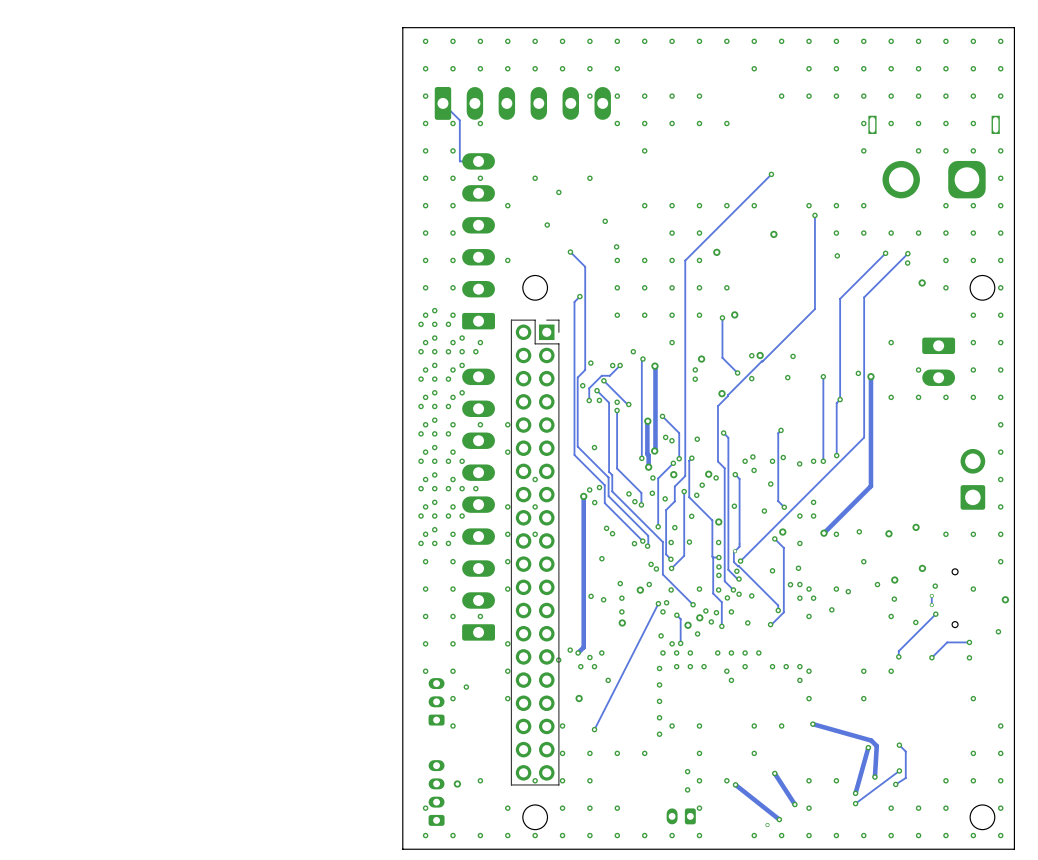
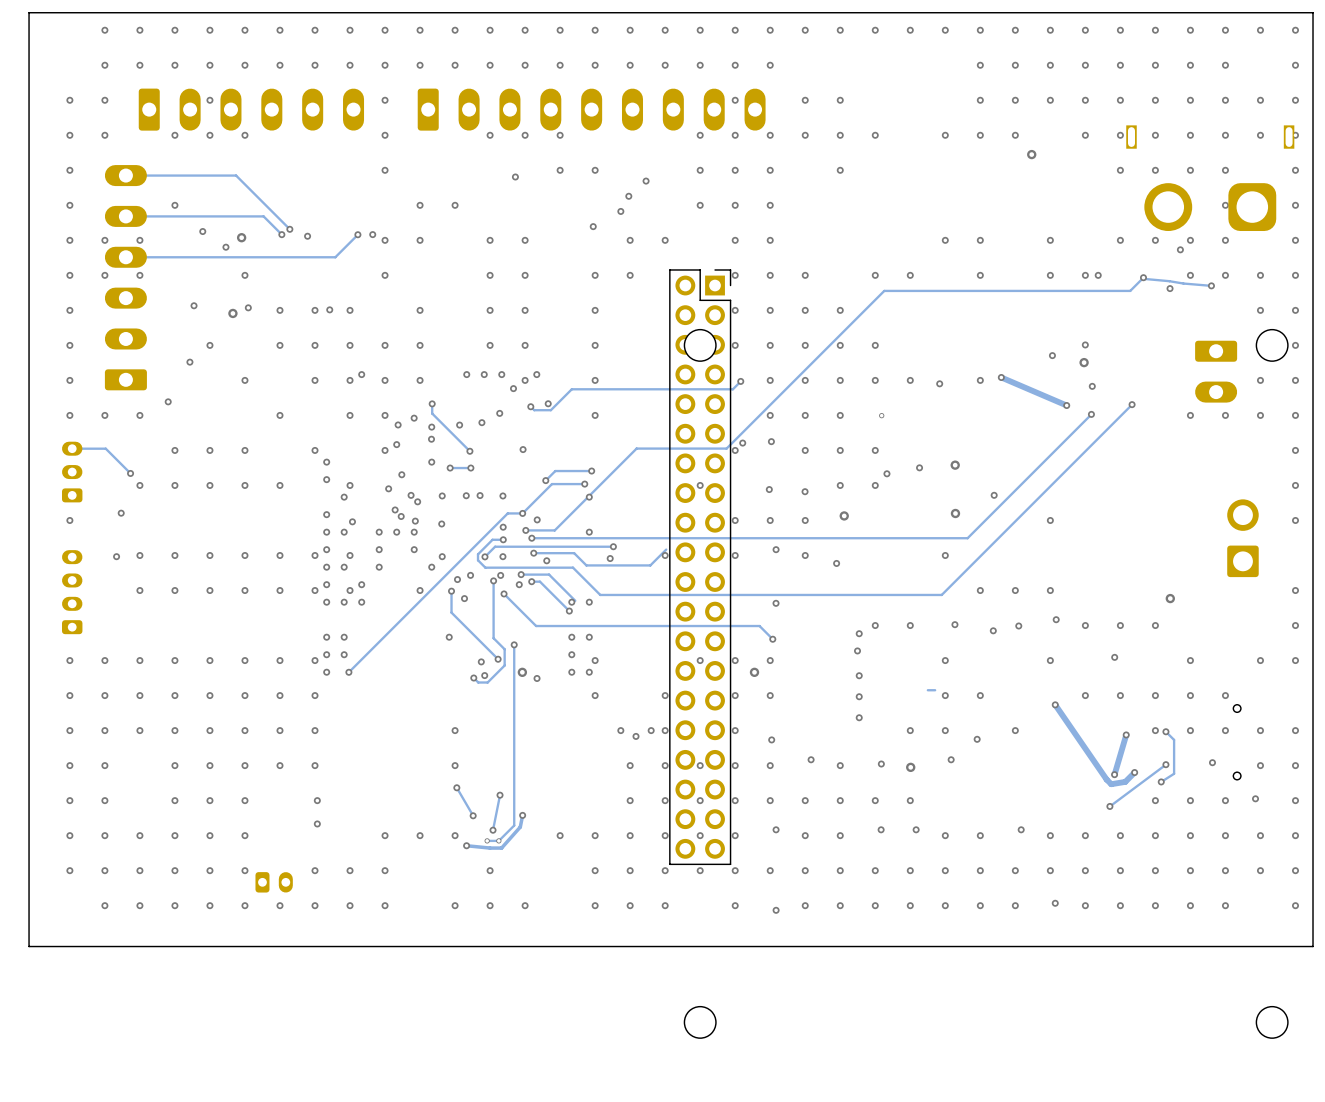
board edge: (402, 27) (402, 849) (1014, 849) (1014, 757) -> (530, 12) (29, 12) (29, 946) (1313, 946)
via: none -> (104, 30)
via: none -> (139, 30)
via: none -> (174, 30)
via: none -> (209, 30)
via: none -> (244, 30)
via: none -> (279, 30)
via: none -> (315, 30)
via: none -> (350, 30)
via: none -> (385, 30)
via: none -> (420, 30)
via: none -> (455, 30)
via: none -> (490, 30)
via: none -> (525, 30)
via: none -> (104, 65)
via: none -> (139, 65)
via: none -> (174, 65)
via: none -> (209, 65)
via: none -> (244, 65)
via: none -> (279, 65)
via: none -> (315, 65)
via: none -> (350, 65)
via: none -> (385, 65)
via: none -> (420, 65)
via: none -> (455, 65)
via: none -> (490, 65)
via: none -> (525, 65)
via: (617, 68) -> none
via: none -> (1015, 65)
via: (973, 68) -> none
via: none -> (69, 100)
via: none -> (104, 100)
via: none -> (209, 100)
via: none -> (385, 100)
via: (425, 96) -> none
via: none -> (735, 100)
via: (589, 96) -> none
via: (672, 96) -> none
via: (699, 96) -> none
via: none -> (980, 100)
part: none -> (251, 109)
track: (442, 103) (459, 120) (459, 161) (478, 161) -> none
part: none -> (591, 109)
part: (522, 103) -> none
via: none -> (69, 135)
via: none -> (104, 135)
via: none -> (174, 135)
via: none -> (209, 135)
via: none -> (244, 135)
via: none -> (385, 135)
via: none -> (490, 135)
via: none -> (525, 135)
via: (453, 123) -> none
via: (480, 123) -> none
via: none -> (700, 135)
via: none -> (735, 135)
via: none -> (770, 135)
via: (699, 123) -> none
via: none -> (980, 135)
via: none -> (1015, 135)
via: none -> (1085, 135)
via: none -> (1295, 135)
via: none -> (1031, 154)
via: none -> (69, 170)
via: none -> (385, 170)
via: none -> (700, 170)
via: none -> (735, 170)
via: none -> (770, 170)
via: none -> (1155, 170)
via: (973, 150) -> none
track: none -> (125, 175) (236, 175) (289, 229)
via: none -> (515, 176)
via: none -> (646, 181)
via: none -> (628, 196)
track: (771, 174) (685, 260) (685, 476) (674, 486) (674, 501) (666, 510) (666, 554) (670, 559) -> none
via: (771, 174) -> none
via: none -> (69, 205)
via: none -> (174, 205)
via: none -> (420, 205)
via: none -> (455, 205)
via: (425, 178) -> none
via: (453, 178) -> none
via: (480, 178) -> none
via: none -> (735, 205)
via: none -> (1225, 205)
via: none -> (620, 211)
track: none -> (125, 216) (263, 216) (281, 234)
via: (558, 192) -> none
via: none -> (593, 226)
via: none -> (289, 229)
via: none -> (202, 231)
via: none -> (281, 234)
track: none -> (357, 234) (335, 257) (125, 257)
via: none -> (357, 234)
via: none -> (372, 234)
via: none -> (307, 236)
via: none -> (241, 237)
via: none -> (69, 240)
via: none -> (104, 240)
via: none -> (139, 240)
via: none -> (385, 240)
via: none -> (420, 240)
via: none -> (490, 240)
via: none -> (525, 240)
via: (425, 205) -> none
via: (453, 205) -> none
via: none -> (630, 240)
via: none -> (735, 240)
via: none -> (770, 240)
via: (644, 205) -> none
via: (672, 205) -> none
via: (699, 205) -> none
via: (836, 205) -> none
via: none -> (1155, 240)
via: none -> (1190, 240)
via: (973, 205) -> none
via: none -> (225, 247)
via: none -> (1180, 249)
track: (814, 215) (814, 309) (717, 406) (717, 461) (724, 468) (724, 581) (733, 589) -> none
via: (814, 215) -> none
via: (605, 221) -> none
via: (547, 225) -> none
via: none -> (69, 275)
via: none -> (104, 275)
via: none -> (139, 275)
via: none -> (244, 275)
via: none -> (385, 275)
via: none -> (490, 275)
via: none -> (525, 275)
via: (425, 233) -> none
via: none -> (630, 275)
via: none -> (735, 275)
via: none -> (770, 275)
via: none -> (805, 275)
via: none -> (980, 275)
via: none -> (1050, 275)
via: none -> (1098, 275)
via: (863, 233) -> none
via: (891, 233) -> none
part: none -> (125, 277)
via: (773, 234) -> none
via: none -> (1143, 277)
part: (478, 241) -> none
track: none -> (1211, 285) (1143, 277) (1130, 290) (884, 290) (726, 448) (636, 448) (554, 530) (525, 530)
via: none -> (1211, 285)
via: none -> (1170, 288)
via: (616, 246) -> none
track: (570, 252) (585, 266) (585, 370) (577, 377) (577, 446) (608, 477) (608, 496) (648, 535) (647, 546) -> none
via: (570, 252) -> none
via: (716, 252) -> none
track: (885, 253) (840, 298) (840, 399) (836, 403) (836, 455) -> none
via: (885, 253) -> none
track: (907, 253) (864, 297) (864, 437) (740, 561) -> none
via: (907, 253) -> none
via: (837, 255) -> none
via: none -> (194, 305)
via: none -> (248, 307)
via: none -> (69, 310)
via: none -> (279, 310)
via: none -> (315, 310)
via: none -> (329, 309)
via: none -> (350, 310)
via: none -> (420, 310)
via: none -> (490, 310)
via: none -> (525, 310)
via: (425, 260) -> none
via: (507, 260) -> none
via: none -> (735, 310)
via: none -> (770, 310)
via: (672, 260) -> none
via: (699, 260) -> none
via: (945, 260) -> none
via: none -> (232, 313)
via: (907, 263) -> none
via: (922, 282) -> none
via: none -> (69, 345)
via: none -> (209, 345)
via: none -> (279, 345)
via: none -> (315, 345)
via: none -> (350, 345)
via: none -> (385, 345)
via: none -> (420, 345)
via: none -> (490, 345)
via: none -> (525, 345)
via: (425, 287) -> none
via: none -> (735, 345)
via: none -> (770, 345)
via: (699, 287) -> none
via: (726, 287) -> none
via: none -> (1085, 344)
via: (945, 287) -> none
via: none -> (1052, 355)
track: (579, 296) (574, 301) (574, 455) (604, 485) (604, 503) (642, 541) -> none
via: (579, 296) -> none
via: none -> (189, 362)
via: none -> (1084, 362)
via: none -> (361, 374)
via: none -> (466, 374)
via: none -> (484, 374)
via: none -> (501, 374)
via: none -> (536, 374)
via: (434, 310) -> none
track: none -> (1001, 377) (1066, 405)
via: none -> (1001, 377)
via: (734, 314) -> none
via: none -> (69, 380)
via: none -> (244, 380)
via: none -> (315, 380)
via: none -> (350, 380)
via: none -> (385, 380)
via: none -> (420, 380)
via: none -> (525, 380)
via: (425, 315) -> none
via: none -> (770, 380)
via: none -> (980, 380)
track: none -> (740, 381) (732, 389) (571, 389) (550, 410) (534, 410) (530, 406)
via: none -> (740, 381)
track: (722, 317) (722, 357) (737, 373) -> none
via: none -> (1092, 386)
via: none -> (513, 388)
via: (421, 324) -> none
via: (434, 324) -> none
via: (448, 324) -> none
via: none -> (168, 401)
track: none -> (432, 403) (432, 413) (469, 451)
via: none -> (432, 403)
via: none -> (548, 403)
via: none -> (1066, 405)
track: none -> (1132, 404) (941, 594) (600, 594) (573, 567) (485, 567) (478, 560) (478, 554) (492, 539) (503, 539)
via: none -> (1132, 404)
via: none -> (530, 406)
via: (434, 338) -> none
via: (462, 338) -> none
via: none -> (499, 413)
track: none -> (1091, 414) (967, 538) (531, 538)
via: none -> (1091, 414)
via: none -> (69, 415)
via: none -> (104, 415)
via: none -> (139, 415)
via: none -> (279, 415)
via: none -> (350, 415)
via: none -> (385, 415)
via: (425, 342) -> none
via: (480, 342) -> none
via: none -> (770, 415)
via: none -> (805, 415)
via: none -> (840, 415)
via: (672, 342) -> none
via: none -> (881, 415)
via: (891, 342) -> none
via: none -> (1190, 415)
via: none -> (1225, 415)
via: none -> (414, 418)
via: none -> (481, 422)
via: none -> (398, 424)
via: none -> (459, 425)
via: none -> (431, 427)
via: (421, 351) -> none
via: (434, 351) -> none
via: (448, 351) -> none
via: (462, 351) -> none
via: (475, 351) -> none
via: (633, 351) -> none
via: (751, 355) -> none
via: (760, 355) -> none
via: (793, 356) -> none
track: (642, 359) (641, 458) -> none
via: (642, 359) -> none
via: (701, 359) -> none
via: none -> (431, 439)
part position: (938, 361) -> (1216, 371)
via: none -> (742, 443)
via: none -> (396, 444)
via: (434, 365) -> none
via: (462, 365) -> none
via: (612, 365) -> none
track: (620, 365) (609, 375) (601, 375) (589, 388) (589, 400) -> none
via: (620, 365) -> none
track: (654, 366) (654, 451) -> none
via: (654, 366) -> none
track: none -> (72, 448) (105, 448) (130, 473)
via: none -> (174, 450)
via: none -> (209, 450)
via: none -> (244, 450)
via: none -> (315, 450)
via: none -> (385, 450)
via: none -> (523, 449)
via: (425, 369) -> none
via: (453, 369) -> none
via: none -> (735, 450)
via: none -> (805, 450)
via: none -> (840, 450)
via: none -> (875, 450)
via: (695, 369) -> none
via: (918, 369) -> none
via: (973, 369) -> none
via: none -> (469, 451)
via: (737, 373) -> none
via: (858, 373) -> none
track: (823, 376) (823, 461) -> none
via: (823, 376) -> none
track: (870, 376) (870, 486) (823, 533) -> none
via: (870, 376) -> none
via: (787, 377) -> none
via: (751, 378) -> none
via: none -> (326, 462)
via: none -> (431, 462)
via: (421, 379) -> none
via: (434, 379) -> none
via: (448, 379) -> none
via: (695, 379) -> none
track: (603, 380) (628, 404) -> none
via: (603, 380) -> none
via: none -> (955, 465)
via: none -> (450, 468)
track: none -> (470, 468) (450, 468)
via: none -> (470, 468)
via: none -> (919, 467)
via: (582, 385) -> none
part: none -> (72, 472)
track: none -> (591, 471) (555, 471) (545, 480)
via: none -> (591, 471)
via: none -> (130, 473)
via: none -> (401, 474)
via: none -> (886, 473)
track: (597, 390) (609, 402) (609, 471) (612, 475) (612, 491) (662, 542) (662, 574) (693, 604) -> none
via: (597, 390) -> none
via: none -> (326, 479)
via: (434, 392) -> none
via: (462, 392) -> none
via: none -> (545, 480)
via: (722, 393) -> none
track: none -> (584, 484) (551, 484) (522, 513) (507, 513) (348, 672)
via: none -> (584, 484)
via: none -> (139, 485)
via: none -> (174, 485)
via: none -> (209, 485)
via: none -> (244, 485)
via: none -> (279, 485)
via: none -> (350, 485)
via: (425, 397) -> none
via: (453, 397) -> none
via: none -> (700, 485)
via: none -> (840, 485)
via: none -> (875, 485)
via: (891, 397) -> none
via: (918, 397) -> none
via: (945, 397) -> none
via: (973, 397) -> none
via: (840, 399) -> none
via: none -> (388, 488)
via: (599, 400) -> none
via: (628, 404) -> none
via: none -> (411, 495)
via: none -> (442, 495)
via: none -> (466, 495)
via: none -> (480, 495)
via: none -> (502, 495)
via: none -> (994, 495)
via: none -> (344, 497)
via: (421, 406) -> none
via: (434, 406) -> none
via: none -> (417, 501)
track: (617, 410) (617, 468) (641, 492) (641, 504) -> none
via: (617, 410) -> none
via: none -> (395, 509)
track: (662, 416) (679, 433) (679, 458) -> none
via: (662, 416) -> none
via: none -> (121, 513)
via: none -> (522, 513)
via: none -> (955, 513)
via: none -> (326, 514)
via: (434, 420) -> none
via: none -> (401, 516)
track: (647, 421) (648, 467) -> none
via: none -> (69, 520)
via: none -> (537, 519)
via: (425, 424) -> none
via: (453, 424) -> none
via: (480, 424) -> none
via: (507, 424) -> none
via: none -> (735, 520)
via: none -> (770, 520)
via: none -> (805, 520)
via: none -> (1050, 520)
via: none -> (352, 521)
via: none -> (415, 521)
via: none -> (441, 523)
via: none -> (503, 527)
track: (781, 430) (778, 433) (778, 501) (784, 507) -> none
via: (781, 430) -> none
via: none -> (525, 530)
via: none -> (326, 532)
via: none -> (344, 532)
via: none -> (379, 532)
via: none -> (396, 532)
via: none -> (414, 532)
via: (421, 433) -> none
via: (434, 433) -> none
track: (723, 433) (728, 437) (728, 569) (739, 579) -> none
via: (723, 433) -> none
via: (665, 437) -> none
via: none -> (531, 538)
via: none -> (503, 539)
via: (697, 439) -> none
via: (671, 440) -> none
track: none -> (613, 546) (495, 546) (484, 556)
via: none -> (613, 546)
via: none -> (326, 549)
via: none -> (379, 549)
via: none -> (414, 549)
via: (434, 447) -> none
track: none -> (666, 549) (650, 565) (586, 565) (574, 553) (533, 553)
via: none -> (533, 553)
via: (654, 451) -> none
via: none -> (139, 555)
via: none -> (174, 555)
via: none -> (209, 555)
via: none -> (244, 555)
via: none -> (279, 555)
via: none -> (315, 555)
via: none -> (350, 555)
via: (425, 452) -> none
via: (453, 452) -> none
via: none -> (735, 555)
via: none -> (805, 555)
via: none -> (945, 555)
via: (1000, 452) -> none
via: none -> (116, 556)
via: none -> (442, 556)
via: none -> (484, 556)
via: none -> (502, 556)
via: none -> (610, 558)
via: (836, 455) -> none
via: none -> (546, 560)
via: (752, 456) -> none
via: (783, 457) -> none
via: (679, 458) -> none
track: (691, 458) (689, 460) (689, 497) (712, 520) (713, 593) (721, 602) (721, 626) -> none
via: (691, 458) -> none
via: none -> (326, 567)
via: none -> (344, 567)
via: none -> (379, 567)
via: none -> (431, 567)
via: (421, 461) -> none
via: (434, 461) -> none
via: (448, 461) -> none
via: (462, 461) -> none
via: (745, 461) -> none
via: (772, 461) -> none
via: (813, 461) -> none
via: (823, 461) -> none
track: (673, 463) (658, 478) (658, 526) -> none
via: (673, 463) -> none
via: (799, 463) -> none
via: none -> (470, 575)
via: none -> (500, 575)
track: none -> (521, 574) (549, 574) (575, 600)
via: none -> (521, 574)
via: (648, 467) -> none
via: none -> (457, 579)
via: (754, 470) -> none
track: none -> (493, 580) (493, 638) (504, 649) (504, 665) (487, 682) (478, 682) (473, 678)
via: none -> (493, 580)
track: none -> (531, 581) (539, 581) (569, 611)
via: none -> (531, 581)
via: none -> (326, 584)
via: none -> (361, 584)
via: none -> (519, 584)
via: (434, 474) -> none
via: (673, 474) -> none
via: (708, 474) -> none
track: (735, 474) (739, 478) (739, 546) (733, 552) (733, 562) (778, 605) (778, 610) -> none
via: (735, 474) -> none
via: (652, 477) -> none
via: (716, 477) -> none
via: none -> (139, 590)
via: none -> (174, 590)
via: none -> (209, 590)
via: none -> (244, 590)
via: none -> (279, 590)
via: none -> (315, 590)
via: none -> (350, 590)
via: none -> (420, 590)
via: (425, 479) -> none
via: (453, 479) -> none
via: (535, 479) -> none
via: none -> (980, 590)
via: none -> (1015, 590)
via: none -> (1050, 590)
part position: (972, 479) -> (1242, 538)
part: none -> (72, 592)
track: none -> (451, 591) (451, 612) (498, 659)
via: none -> (451, 591)
track: none -> (504, 593) (536, 626) (759, 626) (772, 639)
via: none -> (504, 593)
via: (770, 484) -> none
via: none -> (464, 598)
via: (702, 485) -> none
via: none -> (1170, 598)
via: (599, 487) -> none
via: none -> (326, 602)
via: none -> (344, 602)
via: none -> (361, 602)
via: (421, 488) -> none
via: (462, 488) -> none
via: (475, 488) -> none
via: (589, 489) -> none
via: none -> (776, 603)
track: (684, 491) (684, 555) (671, 568) -> none
via: (684, 491) -> none
via: (628, 493) -> none
via: (652, 493) -> none
via: none -> (569, 611)
via: (696, 495) -> none
track: (583, 496) (583, 647) (578, 652) -> none
via: (583, 496) -> none
via: (665, 498) -> none
via: (634, 501) -> none
via: (434, 502) -> none
via: (594, 502) -> none
part: (478, 504) -> none
via: (641, 504) -> none
via: (425, 506) -> none
via: (453, 506) -> none
via: (507, 506) -> none
via: (535, 506) -> none
via: none -> (875, 625)
via: none -> (910, 625)
via: none -> (1085, 625)
via: none -> (1120, 625)
via: none -> (1155, 625)
via: none -> (859, 633)
via: none -> (326, 637)
via: none -> (344, 637)
via: none -> (449, 637)
via: (421, 516) -> none
via: (462, 516) -> none
via: (691, 516) -> none
via: (799, 516) -> none
via: (813, 516) -> none
via: none -> (772, 639)
track: none -> (514, 644) (514, 825) (498, 840) (487, 840)
via: none -> (514, 644)
via: (718, 522) -> none
via: (674, 527) -> none
via: (916, 527) -> none
via: (606, 528) -> none
via: none -> (326, 654)
via: none -> (344, 654)
via: (782, 532) -> none
via: none -> (498, 659)
via: (612, 533) -> none
via: (823, 533) -> none
via: (888, 533) -> none
via: none -> (69, 660)
via: none -> (104, 660)
via: none -> (139, 660)
via: none -> (174, 660)
via: none -> (209, 660)
via: none -> (244, 660)
via: none -> (279, 660)
via: none -> (315, 660)
via: (425, 534) -> none
via: (507, 534) -> none
via: none -> (735, 660)
via: none -> (770, 660)
via: none -> (945, 660)
via: none -> (1050, 660)
via: (836, 534) -> none
via: none -> (1190, 660)
via: (945, 534) -> none
via: none -> (481, 661)
track: (774, 538) (783, 547) (783, 612) (770, 624) -> none
via: (774, 538) -> none
via: (642, 541) -> none
via: (671, 542) -> none
via: (689, 542) -> none
via: (718, 542) -> none
via: none -> (326, 672)
via: none -> (348, 672)
via: none -> (522, 672)
via: (421, 543) -> none
via: none -> (754, 672)
via: (634, 543) -> none
via: (799, 543) -> none
via: none -> (484, 675)
via: (647, 546) -> none
via: none -> (859, 675)
via: none -> (473, 678)
via: none -> (537, 678)
via: (735, 551) -> none
part position: (535, 552) -> (700, 567)
via: (718, 557) -> none
via position: (601, 558) -> (770, 695)
via: (670, 559) -> none
via: none -> (69, 695)
via: none -> (104, 695)
via: none -> (139, 695)
via: none -> (174, 695)
via: none -> (209, 695)
via: none -> (244, 695)
via: none -> (279, 695)
via: none -> (315, 695)
via: (425, 561) -> none
via: none -> (735, 695)
via: none -> (945, 695)
via: (740, 561) -> none
via: none -> (980, 695)
via: none -> (1085, 695)
via: none -> (1155, 695)
via: none -> (1190, 695)
via: none -> (1225, 695)
via: (1000, 561) -> none
via: none -> (859, 696)
via: (651, 564) -> none
via: (718, 566) -> none
via: (656, 568) -> none
via: (671, 568) -> none
via: (798, 568) -> none
track: none -> (1055, 704) (1111, 784) (1125, 781) (1134, 772)
via: none -> (1055, 704)
via: (922, 568) -> none
via: (772, 570) -> none
via: (736, 571) -> none
via: (718, 575) -> none
via: none -> (859, 717)
via: (739, 579) -> none
via: (894, 580) -> none
via: (620, 583) -> none
via: (649, 584) -> none
via: (790, 584) -> none
via: (799, 584) -> none
via: (877, 584) -> none
via: (935, 586) -> none
via: none -> (69, 730)
via: none -> (104, 730)
via: none -> (139, 730)
via: none -> (174, 730)
via: none -> (209, 730)
via: none -> (244, 730)
via: none -> (279, 730)
via: none -> (315, 730)
via: none -> (455, 730)
via: (425, 589) -> none
via: (453, 589) -> none
via: none -> (620, 730)
via: none -> (651, 730)
via: none -> (735, 730)
via: (671, 589) -> none
via: (718, 589) -> none
via: none -> (945, 730)
via: (733, 589) -> none
via: none -> (1015, 730)
via: (809, 589) -> none
via: (836, 589) -> none
via: none -> (1155, 730)
via: none -> (1165, 731)
via: none -> (1190, 730)
via: none -> (1225, 730)
via: none -> (1295, 730)
via: (640, 590) -> none
via: (848, 591) -> none
track: none -> (1126, 734) (1114, 774)
via: none -> (1126, 734)
via: none -> (636, 736)
via: (739, 594) -> none
track: (931, 595) (931, 605) -> none
via: (931, 595) -> none
via: (727, 597) -> none
via: (621, 598) -> none
via: (799, 598) -> none
via: (813, 598) -> none
via: (603, 599) -> none
via: (894, 599) -> none
via: (1005, 599) -> none
via: (666, 602) -> none
track: (658, 603) (594, 729) -> none
via: (658, 603) -> none
via: (693, 604) -> none
via: (931, 605) -> none
via: (831, 609) -> none
via: (705, 610) -> none
via: (778, 610) -> none
via: (662, 611) -> none
via: (716, 612) -> none
track: (935, 614) (898, 651) (898, 656) -> none
track: (676, 615) (680, 619) (680, 643) -> none
via: none -> (1165, 764)
via: none -> (69, 765)
via: none -> (104, 765)
via: none -> (174, 765)
via: none -> (209, 765)
via: none -> (244, 765)
via: none -> (279, 765)
via: none -> (315, 765)
via: none -> (455, 765)
via: (425, 616) -> none
via: (453, 616) -> none
via: none -> (665, 765)
via: none -> (700, 765)
via: none -> (735, 765)
via: none -> (770, 765)
via: none -> (840, 765)
via: (809, 616) -> none
via: (891, 616) -> none
via: none -> (1260, 765)
via: none -> (1295, 765)
via: (711, 621) -> none
via: none -> (1134, 772)
via: (622, 622) -> none
via: (747, 622) -> none
via: (915, 622) -> none
via: none -> (1114, 774)
via: (770, 624) -> none
via: (688, 625) -> none
via: (721, 626) -> none
via: none -> (1161, 781)
via: (998, 631) -> none
track: none -> (456, 787) (473, 815)
via: none -> (456, 787)
via: (697, 633) -> none
via: (661, 635) -> none
track: none -> (500, 795) (493, 830)
via: none -> (500, 795)
track: (969, 642) (947, 642) (931, 657) -> none
via: none -> (69, 800)
via: none -> (104, 800)
via: none -> (174, 800)
via: none -> (209, 800)
via: none -> (244, 800)
via: none -> (317, 800)
via: (425, 643) -> none
via: (453, 643) -> none
via: none -> (630, 800)
via: none -> (700, 800)
via: none -> (735, 800)
via: none -> (770, 800)
via: none -> (805, 800)
via: none -> (840, 800)
via: (680, 643) -> none
via: none -> (910, 800)
via: none -> (1155, 800)
via: none -> (1190, 800)
via: none -> (1225, 800)
via: none -> (1295, 800)
via: none -> (1109, 806)
via: (570, 650) -> none
via: (578, 652) -> none
via: (601, 652) -> none
via: (662, 652) -> none
via: (676, 652) -> none
via: (690, 652) -> none
via: (717, 652) -> none
via: (731, 652) -> none
via: (745, 652) -> none
via: (758, 652) -> none
via: none -> (473, 815)
track: none -> (522, 815) (520, 827) (501, 848) (466, 845)
via: none -> (522, 815)
via: (898, 656) -> none
via: (589, 657) -> none
via: (931, 657) -> none
via: (969, 657) -> none
via: (558, 660) -> none
via: none -> (317, 823)
via: none -> (493, 830)
via: (580, 666) -> none
via: (690, 666) -> none
via: (745, 666) -> none
via: (772, 666) -> none
via: (799, 666) -> none
via: (659, 668) -> none
via: none -> (69, 835)
via: none -> (104, 835)
via: none -> (139, 835)
via: none -> (174, 835)
via: none -> (209, 835)
via: none -> (244, 835)
via: none -> (385, 835)
via: none -> (420, 835)
via: none -> (455, 835)
via: none -> (630, 835)
via: none -> (700, 835)
via: none -> (735, 835)
via: none -> (805, 835)
via: none -> (840, 835)
via: none -> (980, 835)
via: none -> (1085, 835)
via: none -> (1190, 835)
via: none -> (1225, 835)
via: none -> (1260, 835)
via: none -> (1295, 835)
via: none -> (487, 840)
via: none -> (498, 840)
via: none -> (466, 845)
via: (608, 680) -> none
via: (731, 680) -> none
via: (799, 680) -> none
via: (659, 684) -> none
via: (466, 687) -> none
via: none -> (69, 870)
via: none -> (104, 870)
via: none -> (139, 870)
via: none -> (174, 870)
via: none -> (209, 870)
via: none -> (244, 870)
via: none -> (315, 870)
via: none -> (350, 870)
via: none -> (385, 870)
via: none -> (490, 870)
via: none -> (630, 870)
via: none -> (700, 870)
via: none -> (735, 870)
via: (579, 698) -> none
via: none -> (770, 870)
via: none -> (805, 870)
via: none -> (840, 870)
via: none -> (875, 870)
via: none -> (910, 870)
via: none -> (945, 870)
via: none -> (980, 870)
via: none -> (1015, 870)
via: none -> (1085, 870)
via: none -> (1155, 870)
via: none -> (1190, 870)
via: none -> (1225, 870)
via: none -> (1295, 870)
part: (436, 701) -> none
via: (659, 701) -> none
part: none -> (274, 882)
via: (659, 717) -> none
track: (812, 724) (871, 740) (876, 746) (874, 777) -> none
via: none -> (104, 905)
via: none -> (139, 905)
via: none -> (174, 905)
via: none -> (209, 905)
via: none -> (244, 905)
via: none -> (279, 905)
via: none -> (315, 905)
via: none -> (350, 905)
via: none -> (385, 905)
via: none -> (455, 905)
via: none -> (490, 905)
via: none -> (525, 905)
via: none -> (630, 905)
via: none -> (665, 905)
via: none -> (805, 905)
via: none -> (840, 905)
via: none -> (945, 905)
via: none -> (1085, 905)
via: none -> (1120, 905)
via: none -> (1155, 905)
via: none -> (1190, 905)
via: none -> (1225, 905)
via: (659, 734) -> none
track: (899, 745) (905, 751) (905, 778) (895, 784) -> (1165, 731) (1174, 739) (1174, 773) (1161, 781)
via: (899, 745) -> none
track: (868, 747) (855, 793) -> none
via: (868, 747) -> none
via: (562, 753) -> none
via: (589, 753) -> none
via: (617, 753) -> none
via: (644, 753) -> none
via: (699, 753) -> none
via: (754, 753) -> none
via: (973, 753) -> none
via: (1000, 753) -> none
track: (899, 770) (855, 803) -> (1165, 764) (1109, 806)
via: (899, 770) -> none
via: (687, 771) -> none
track: (774, 773) (794, 804) -> none
via: (774, 773) -> none
via: (874, 777) -> none
via: (480, 780) -> none
via: (535, 780) -> none
via: (562, 780) -> none
via: (589, 780) -> none
via: (699, 780) -> none
via: (726, 780) -> none
via: (809, 780) -> none
via: (836, 780) -> none
via: (945, 780) -> none
via: (973, 780) -> none
via: (1000, 780) -> none
via: (457, 784) -> none
track: (735, 784) (779, 819) -> none
via: (735, 784) -> none
via: (895, 784) -> none
via: (687, 789) -> none
part: (436, 793) -> none
via: (855, 793) -> none
via: (855, 803) -> none
via: (794, 804) -> none
via: (425, 808) -> none
via: (507, 808) -> none
via: (562, 808) -> none
via: (589, 808) -> none
via: (617, 808) -> none
via: (699, 808) -> none
via: (809, 808) -> none
via: (891, 808) -> none
via: (918, 808) -> none
via: (945, 808) -> none
via: (1000, 808) -> none
part: (681, 816) -> none
via: (779, 819) -> none
via: (767, 825) -> none
via: (425, 835) -> none
via: (453, 835) -> none
via: (480, 835) -> none
via: (507, 835) -> none
via: (535, 835) -> none
via: (562, 835) -> none
via: (589, 835) -> none
via: (617, 835) -> none
via: (644, 835) -> none
via: (672, 835) -> none
via: (699, 835) -> none
via: (754, 835) -> none
via: (781, 835) -> none
via: (809, 835) -> none
via: (836, 835) -> none
via: (863, 835) -> none
via: (891, 835) -> none
via: (918, 835) -> none
via: (945, 835) -> none
via: (973, 835) -> none
via: (1000, 835) -> none

